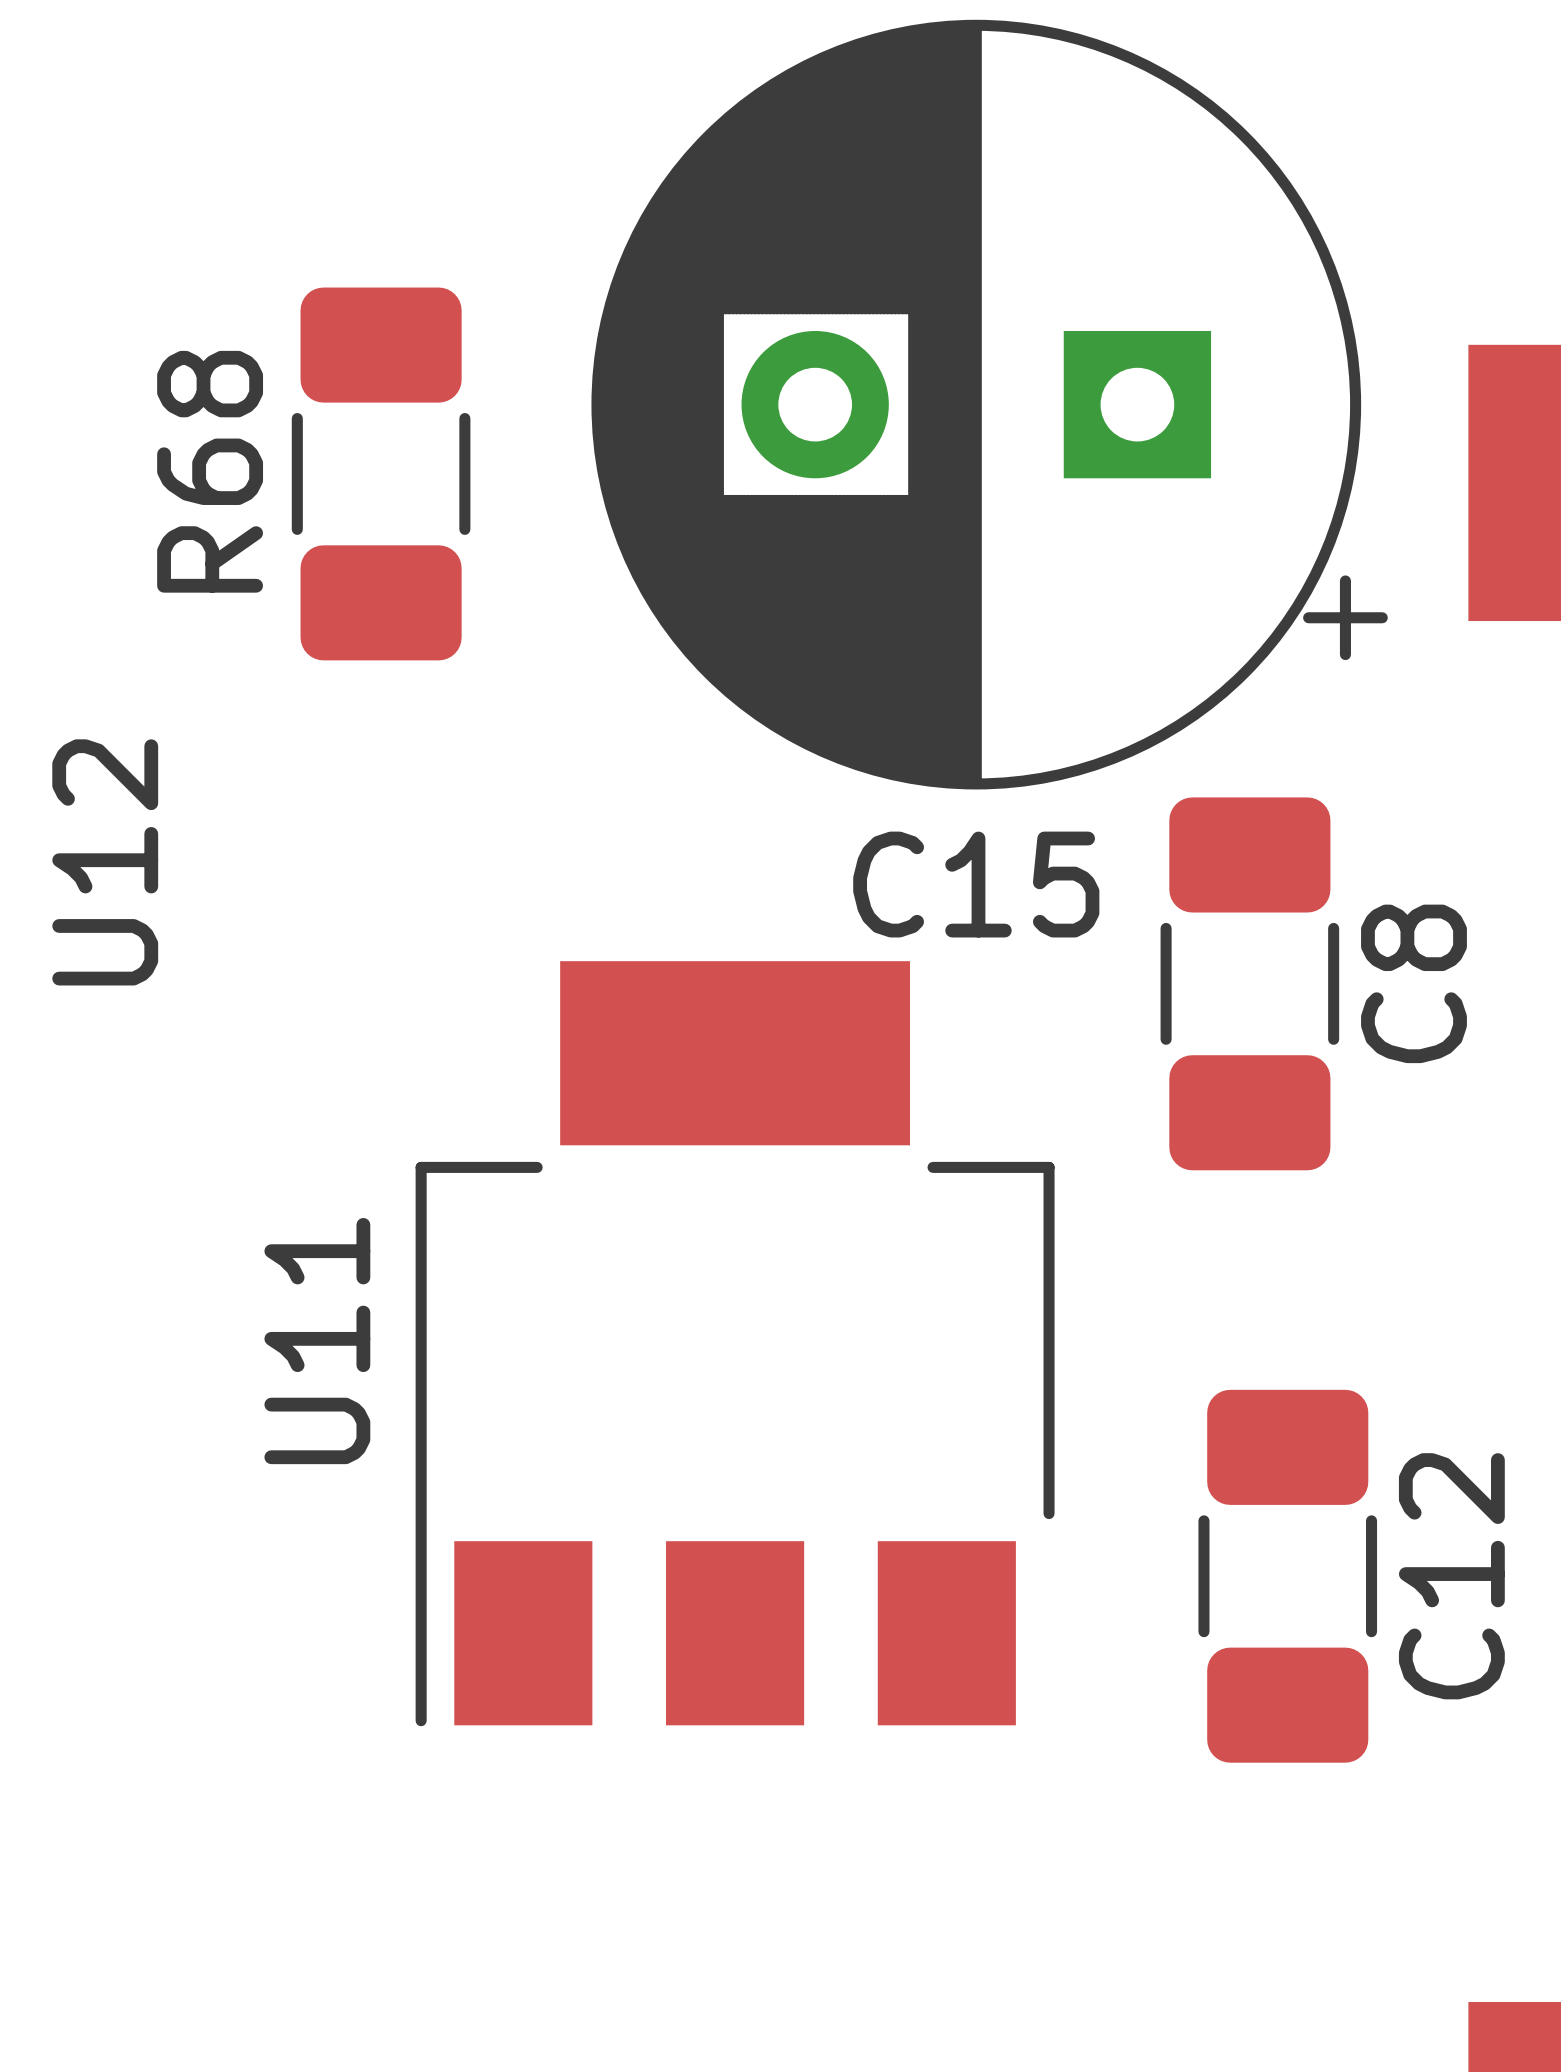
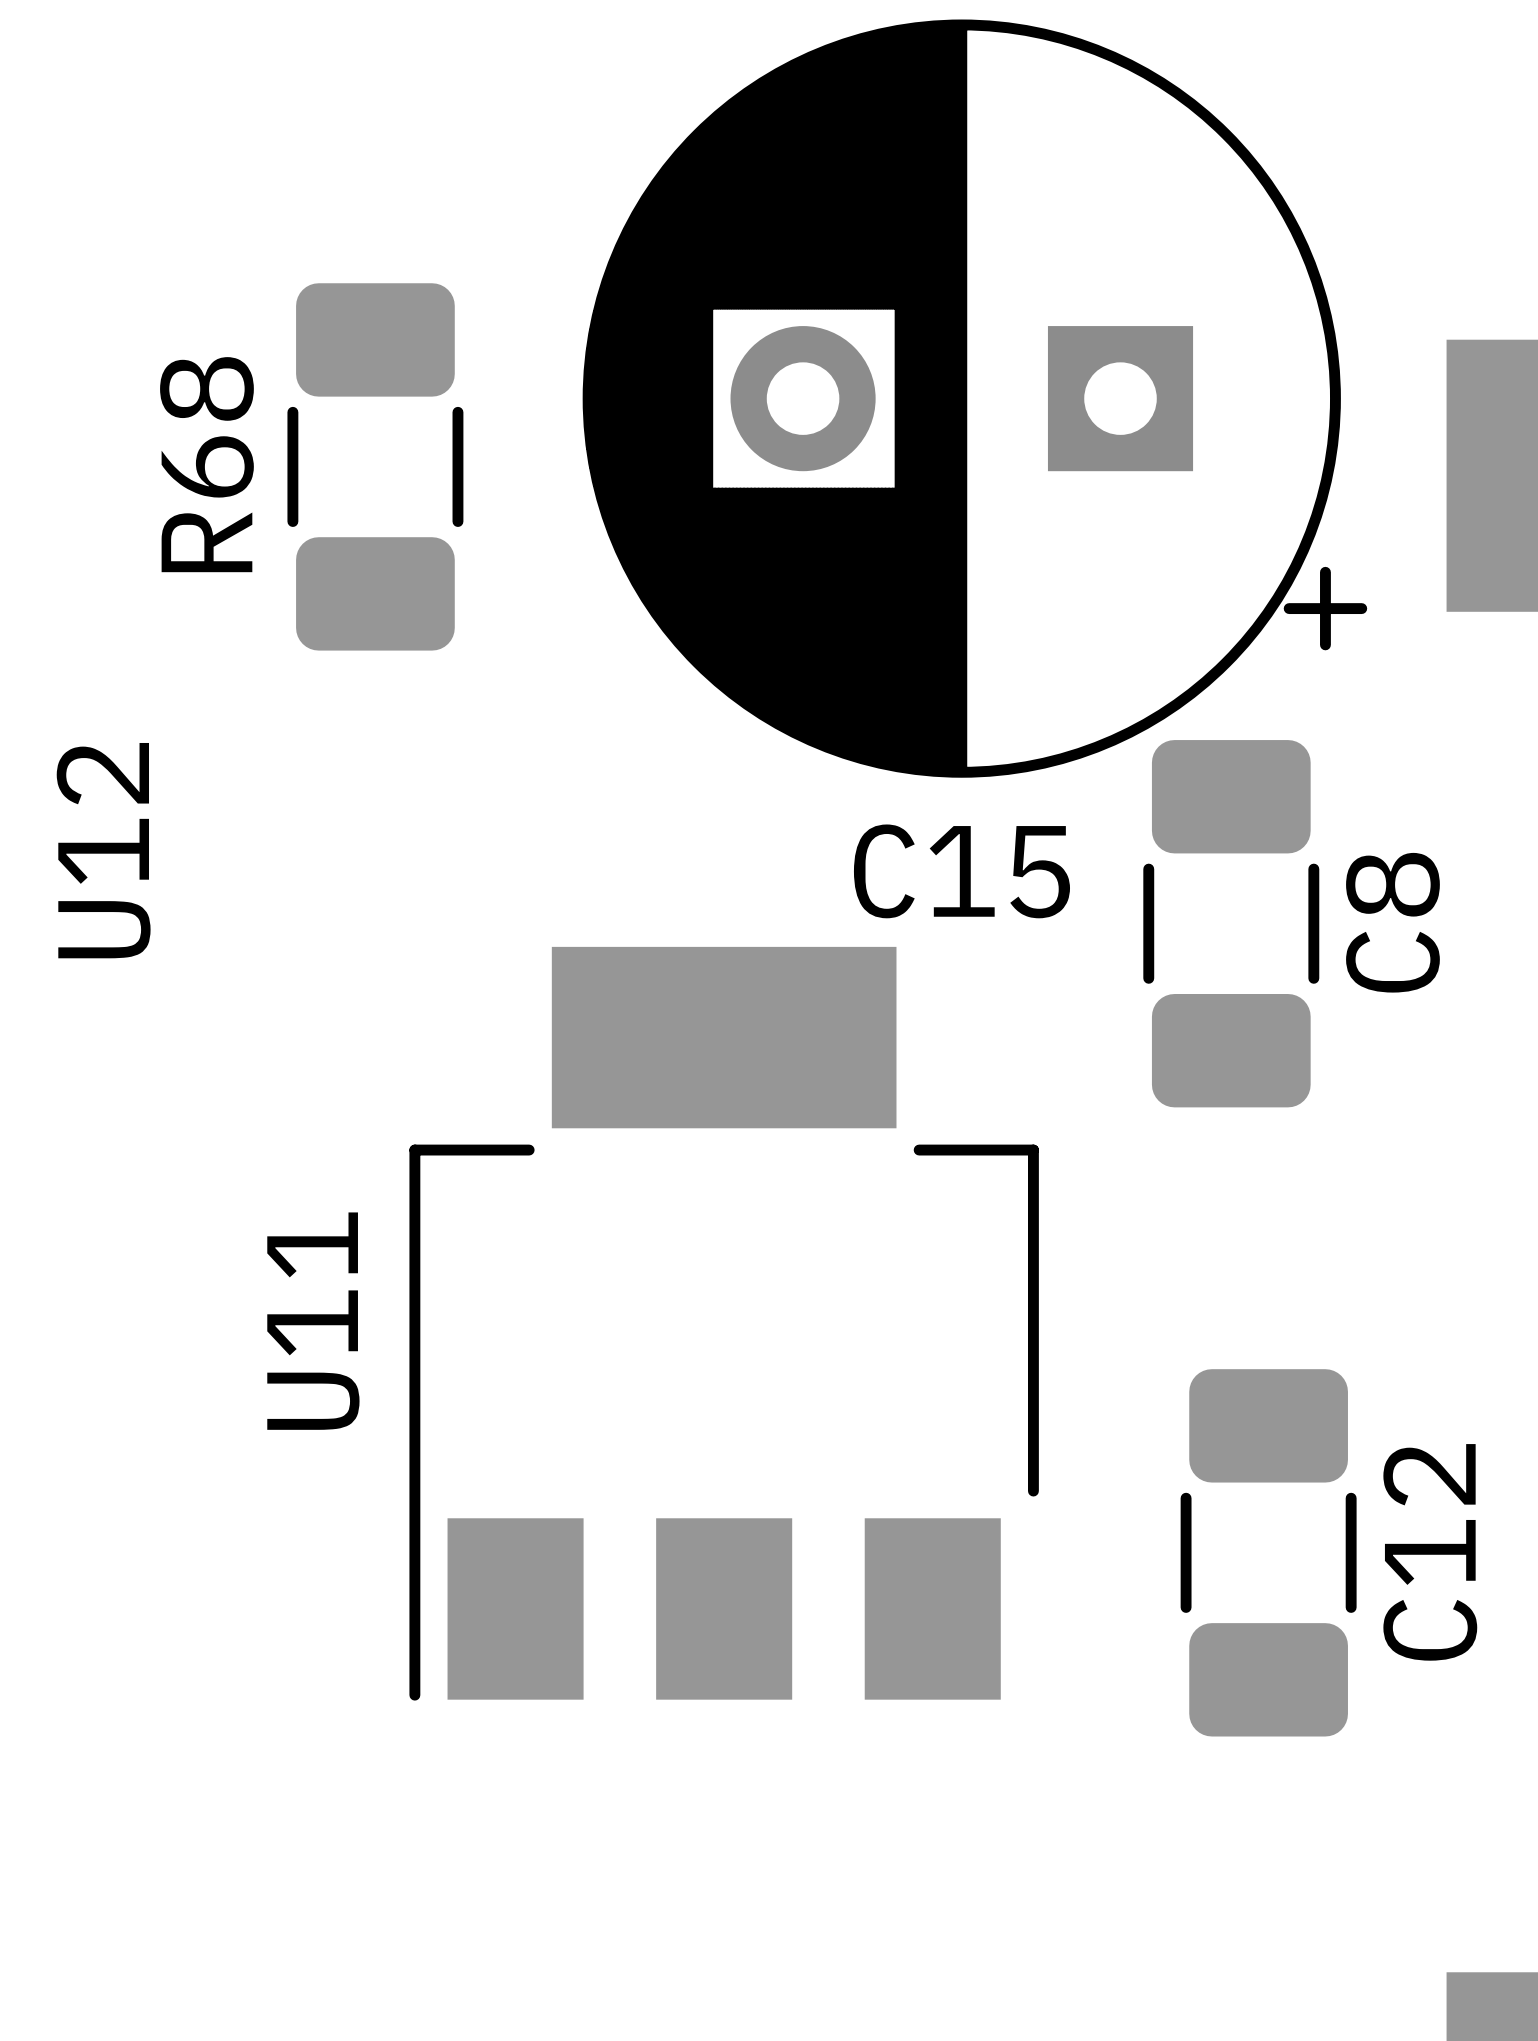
C8 position: (1249, 983) -> (1231, 923)

